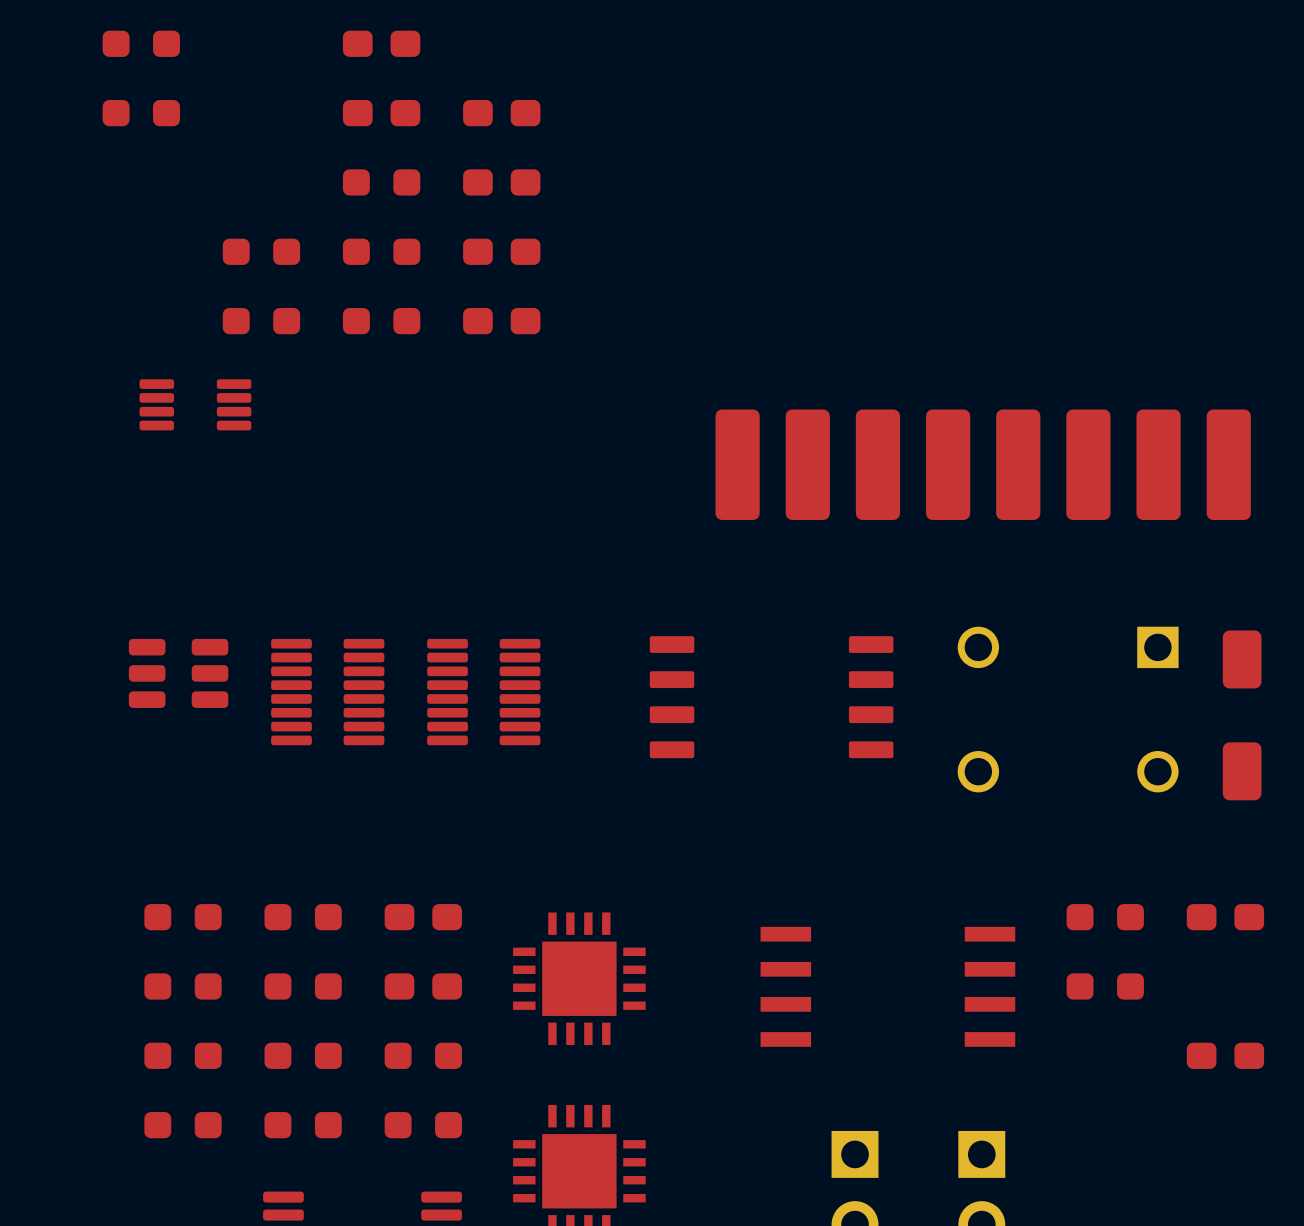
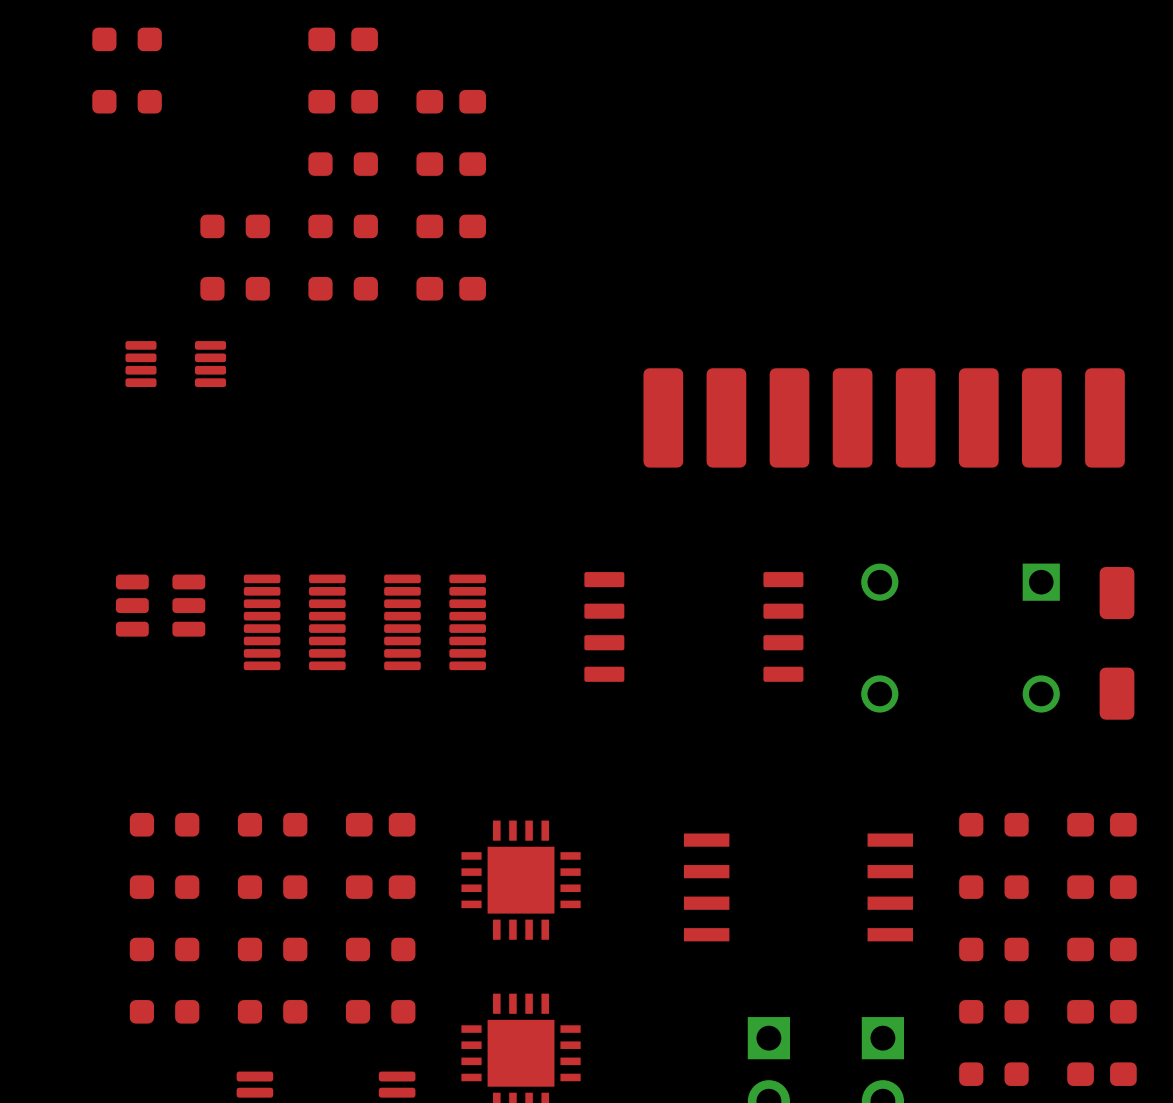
part: none -> (1101, 887)
part: none -> (993, 949)
part: none -> (993, 1011)
part: none -> (1101, 1011)
part: none -> (993, 1074)
part: none -> (1101, 1074)

